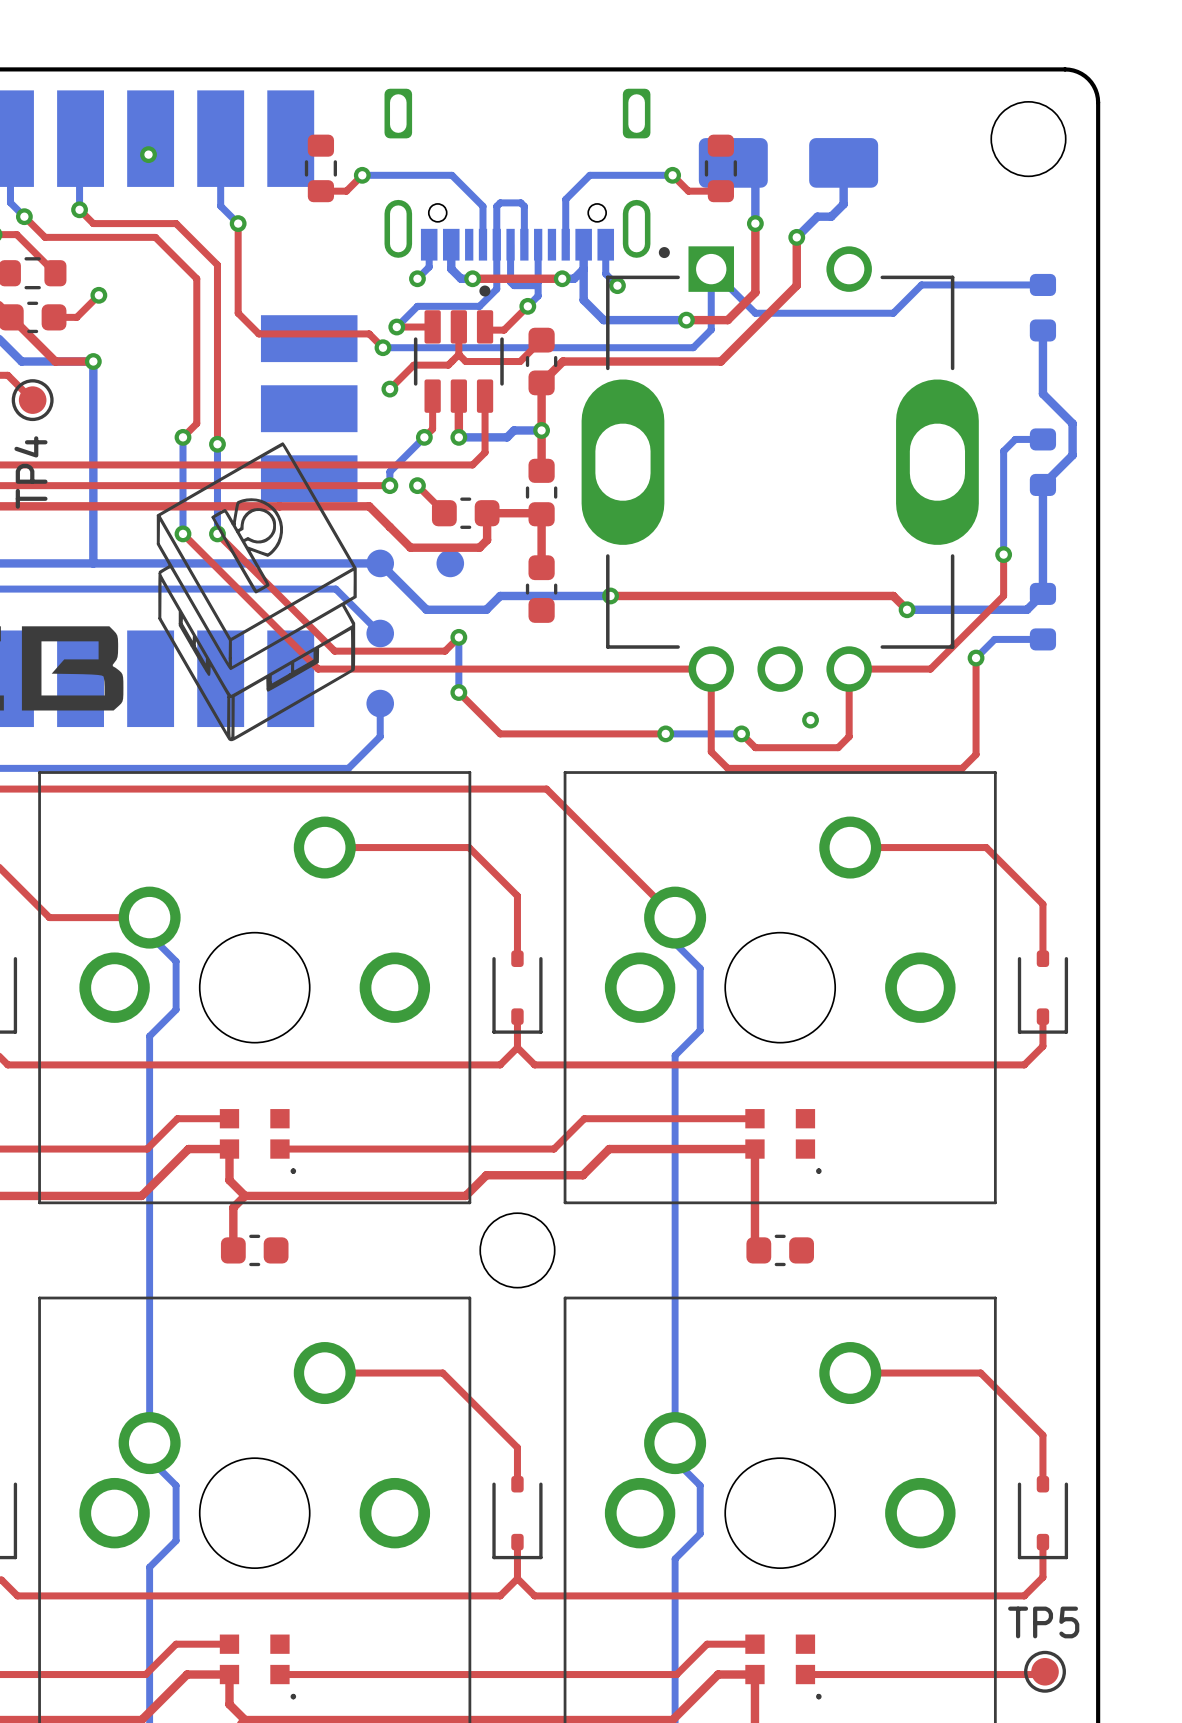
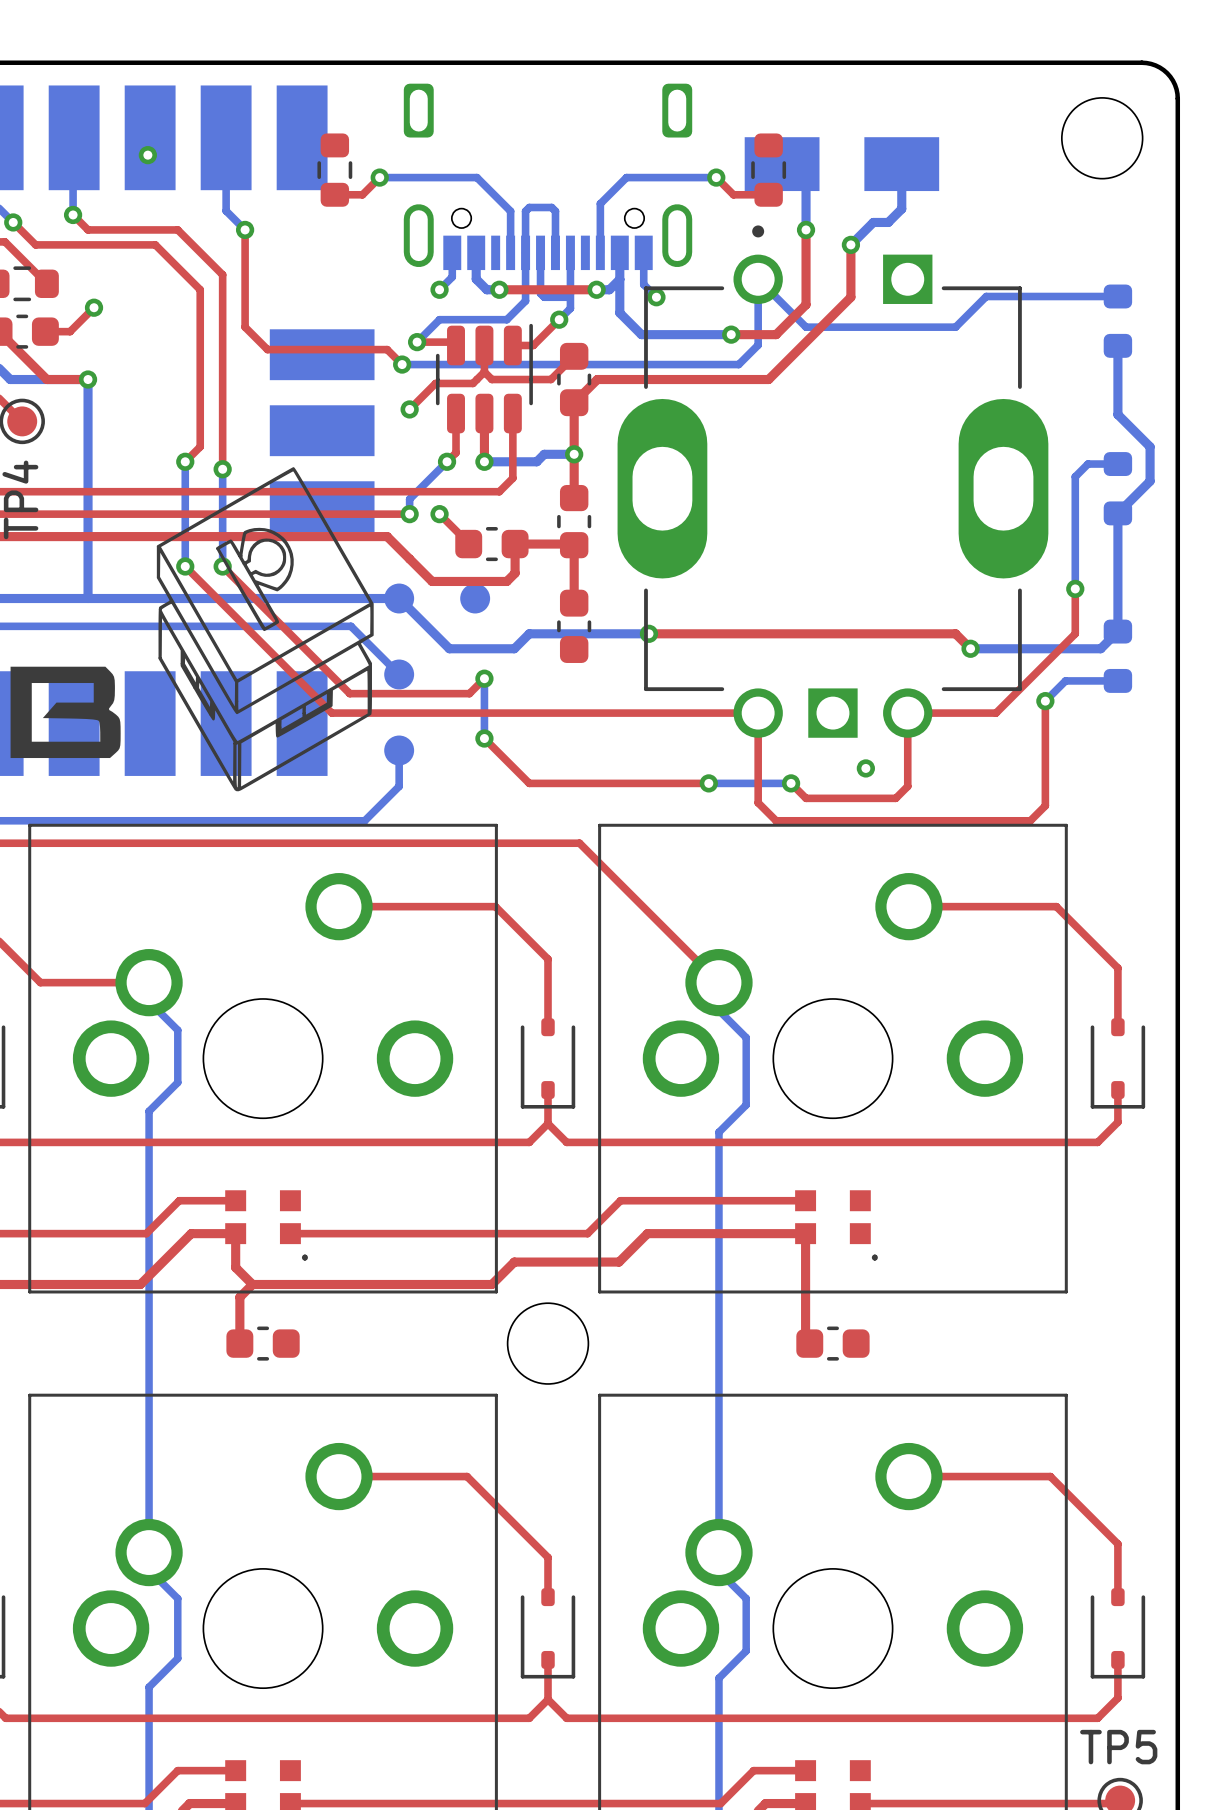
part footprint: [698, 138, 879, 188] -> [744, 137, 940, 192]
part footprint: [581, 246, 979, 692] -> [617, 225, 1049, 738]
part footprint: [413, 285, 504, 413] -> [435, 323, 533, 434]

